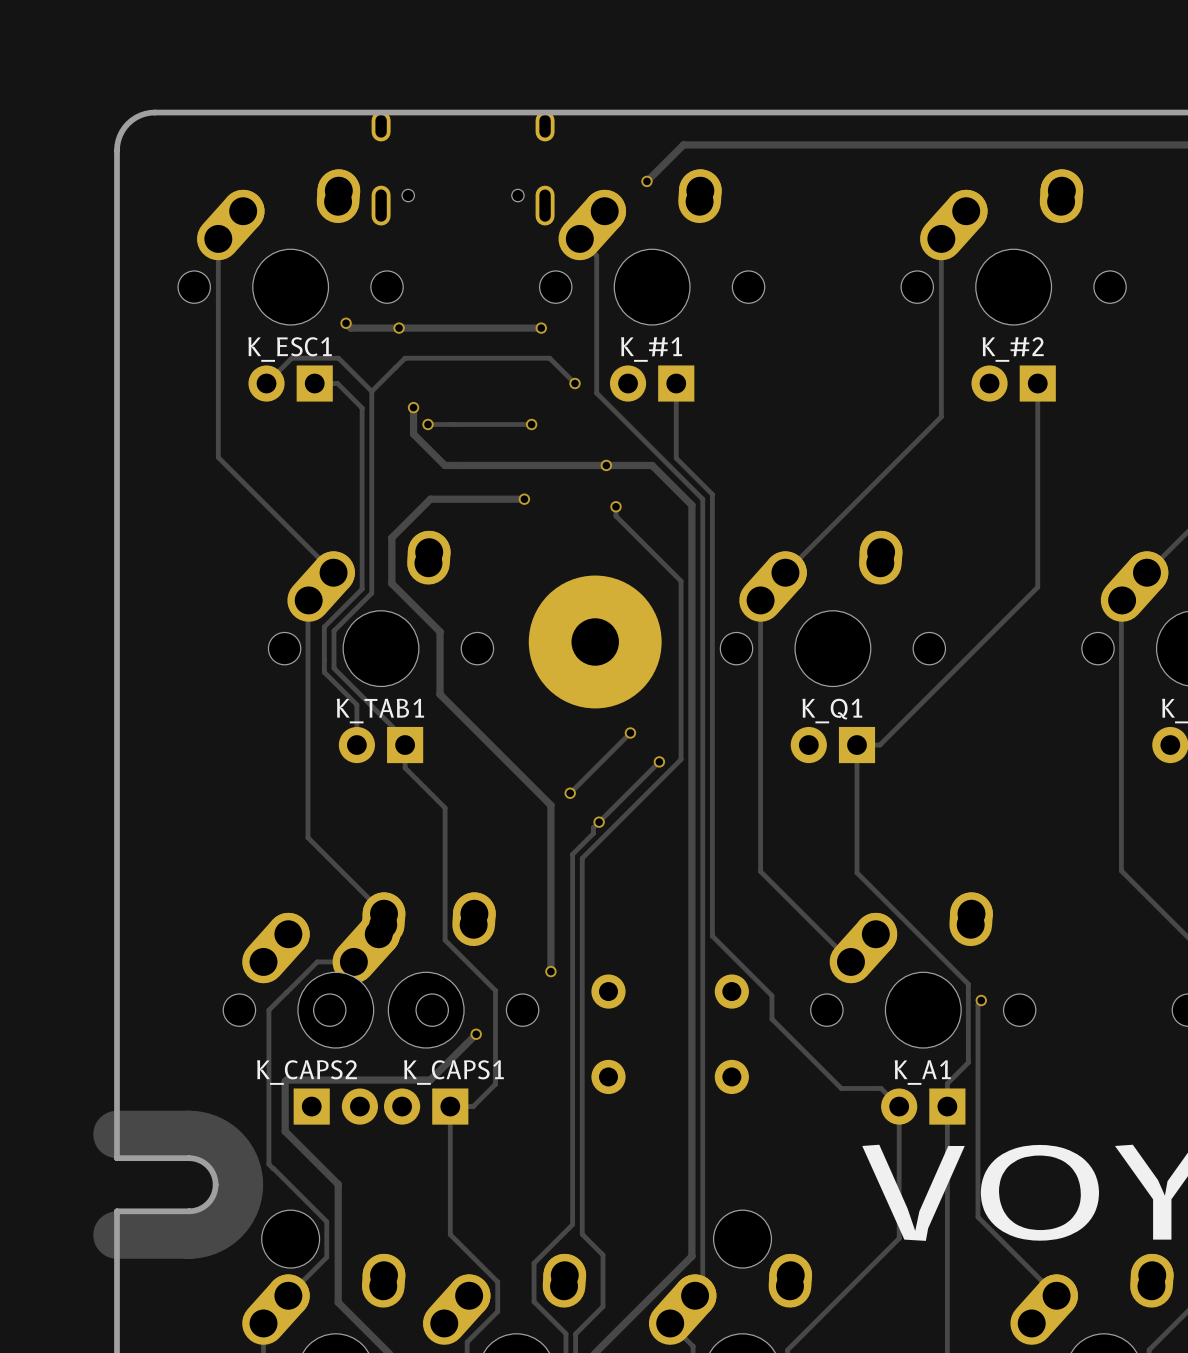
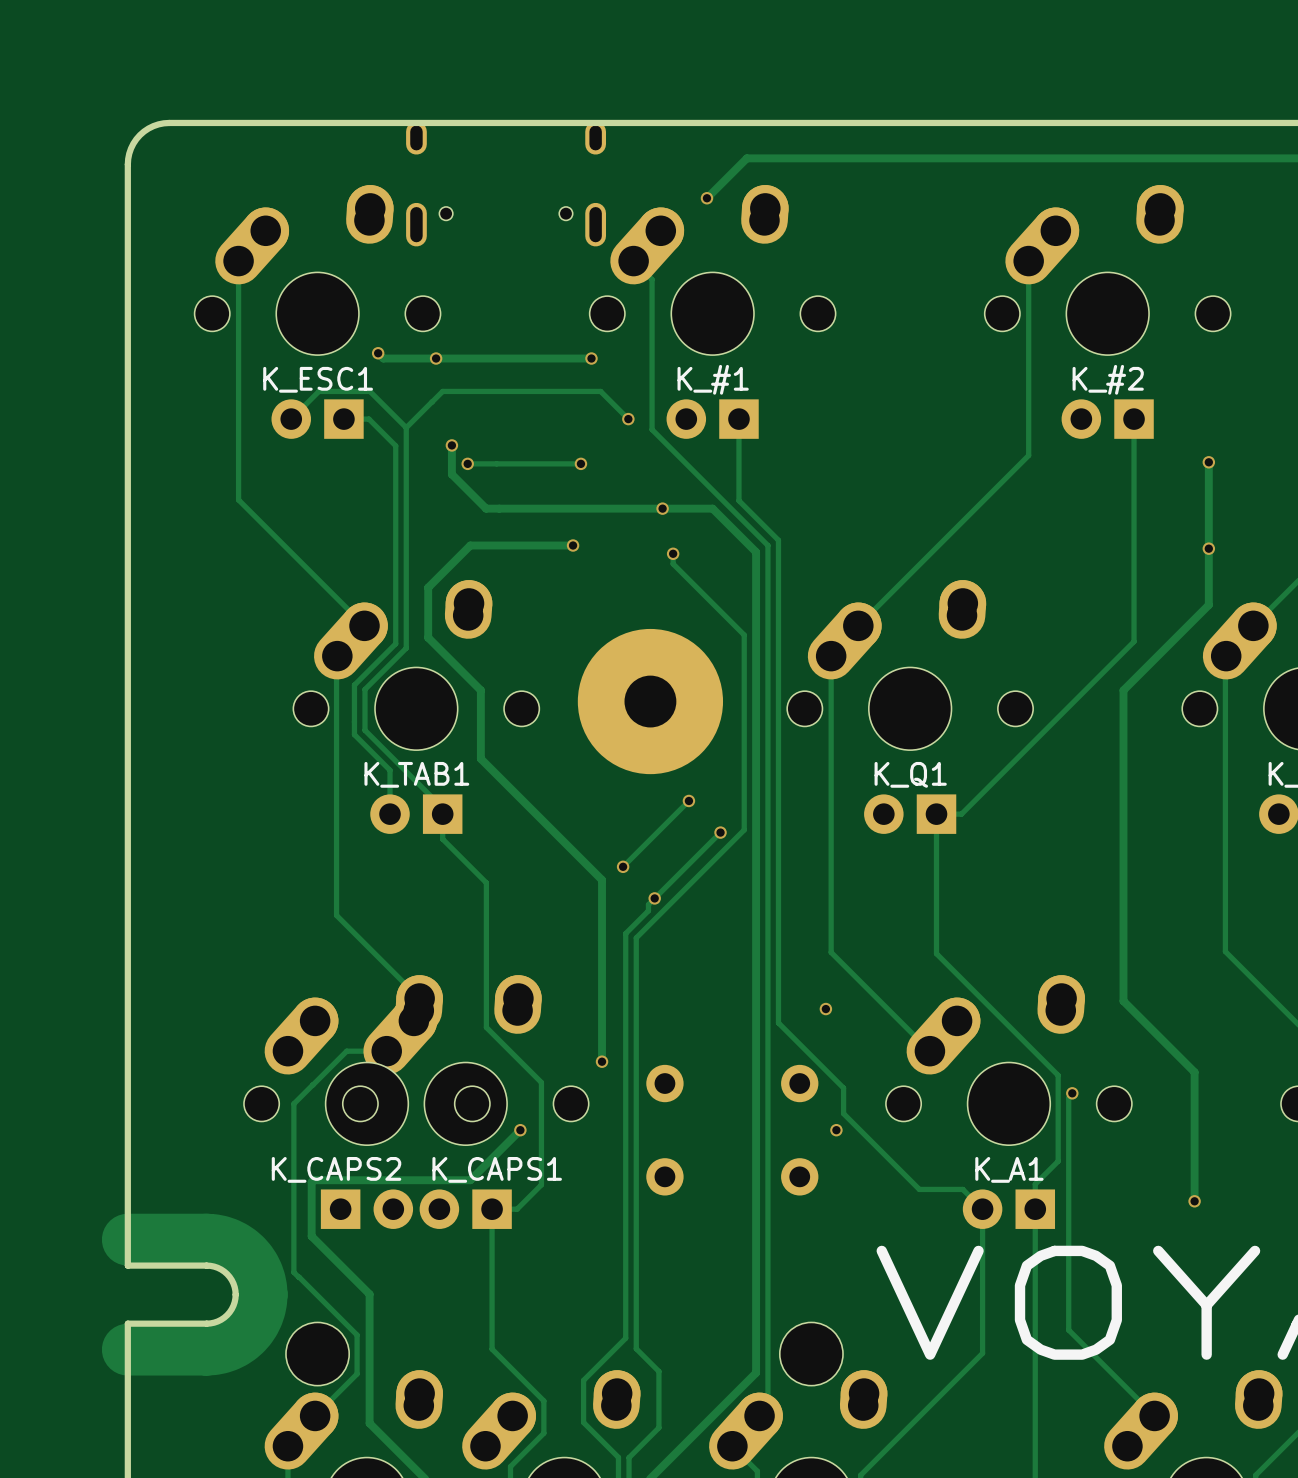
track: none -> (1208, 462) (1208, 605) (1123, 690) (1123, 1001) (1194, 1072) (1194, 1201)
via: none -> (1208, 462)
via: none -> (1208, 548)
via: none -> (825, 1009)
via: none -> (836, 1130)
via: none -> (1194, 1201)

